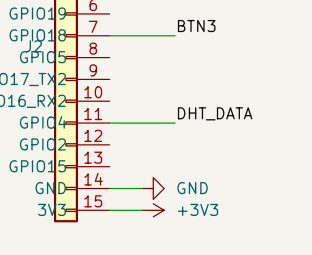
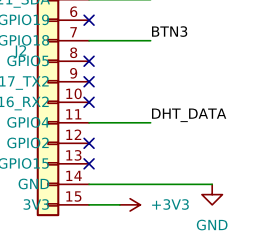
no-connect mark: none -> (89, 20)
no-connect mark: none -> (89, 61)
no-connect mark: none -> (89, 81)
no-connect mark: none -> (89, 102)
no-connect mark: none -> (89, 143)
no-connect mark: none -> (89, 163)
wire: none -> (119, 184) (212, 184)
power symbol rotation: 0° (153, 188) -> 90° clockwise (212, 194)
power symbol position: GND (153, 188) -> GND (212, 194)

